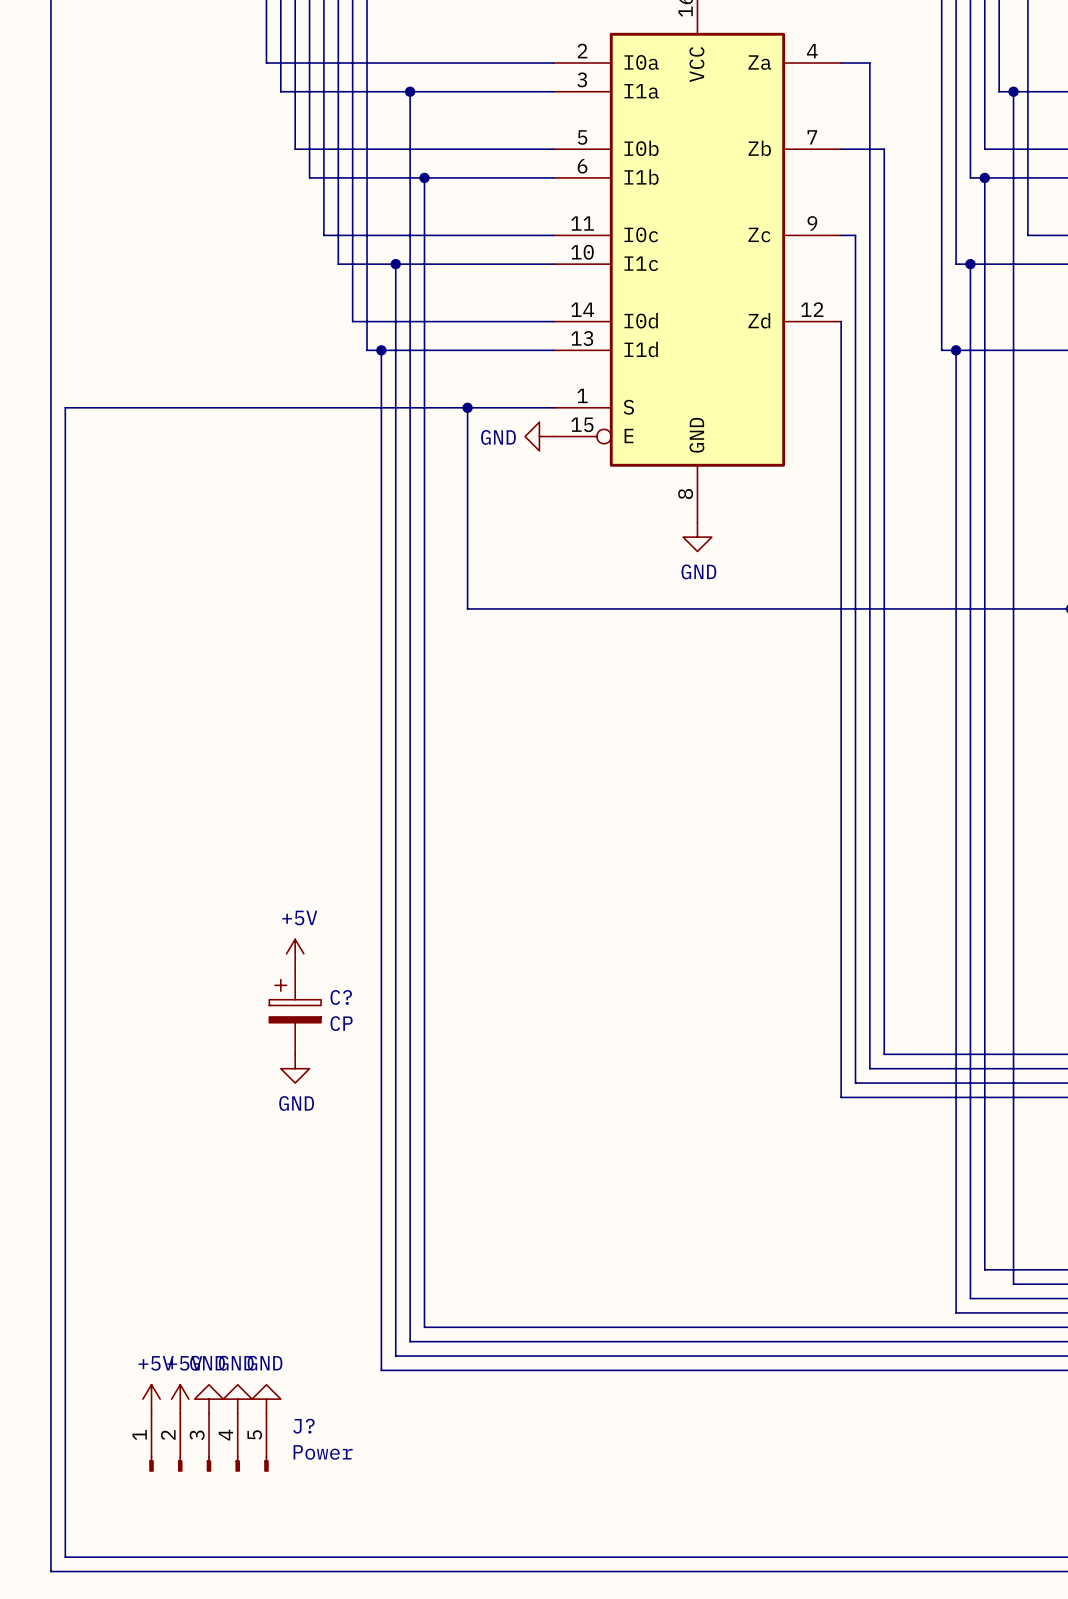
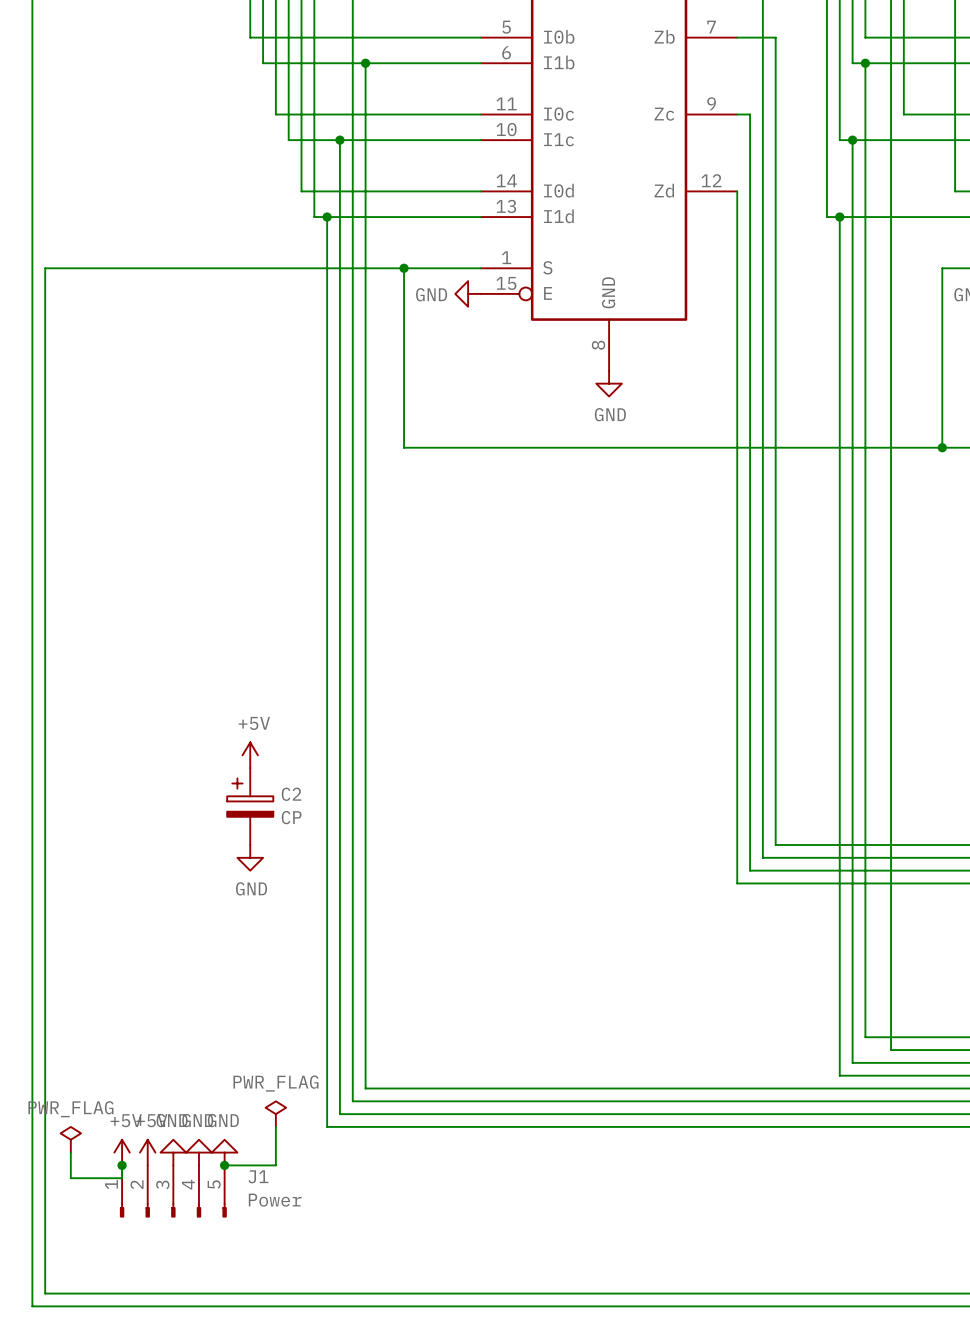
C? name: C? (341, 997) -> C2 (291, 794)
power symbol: none -> PWR_FLAG (275, 1114)
wire: none -> (275, 1126) (275, 1165) (224, 1165)
power symbol: none -> PWR_FLAG (70, 1139)
wire: none -> (70, 1152) (70, 1178) (122, 1178) (122, 1165)
junction: none -> (122, 1165)
junction: none -> (224, 1165)
J? name: J? (303, 1426) -> J1 (258, 1176)

